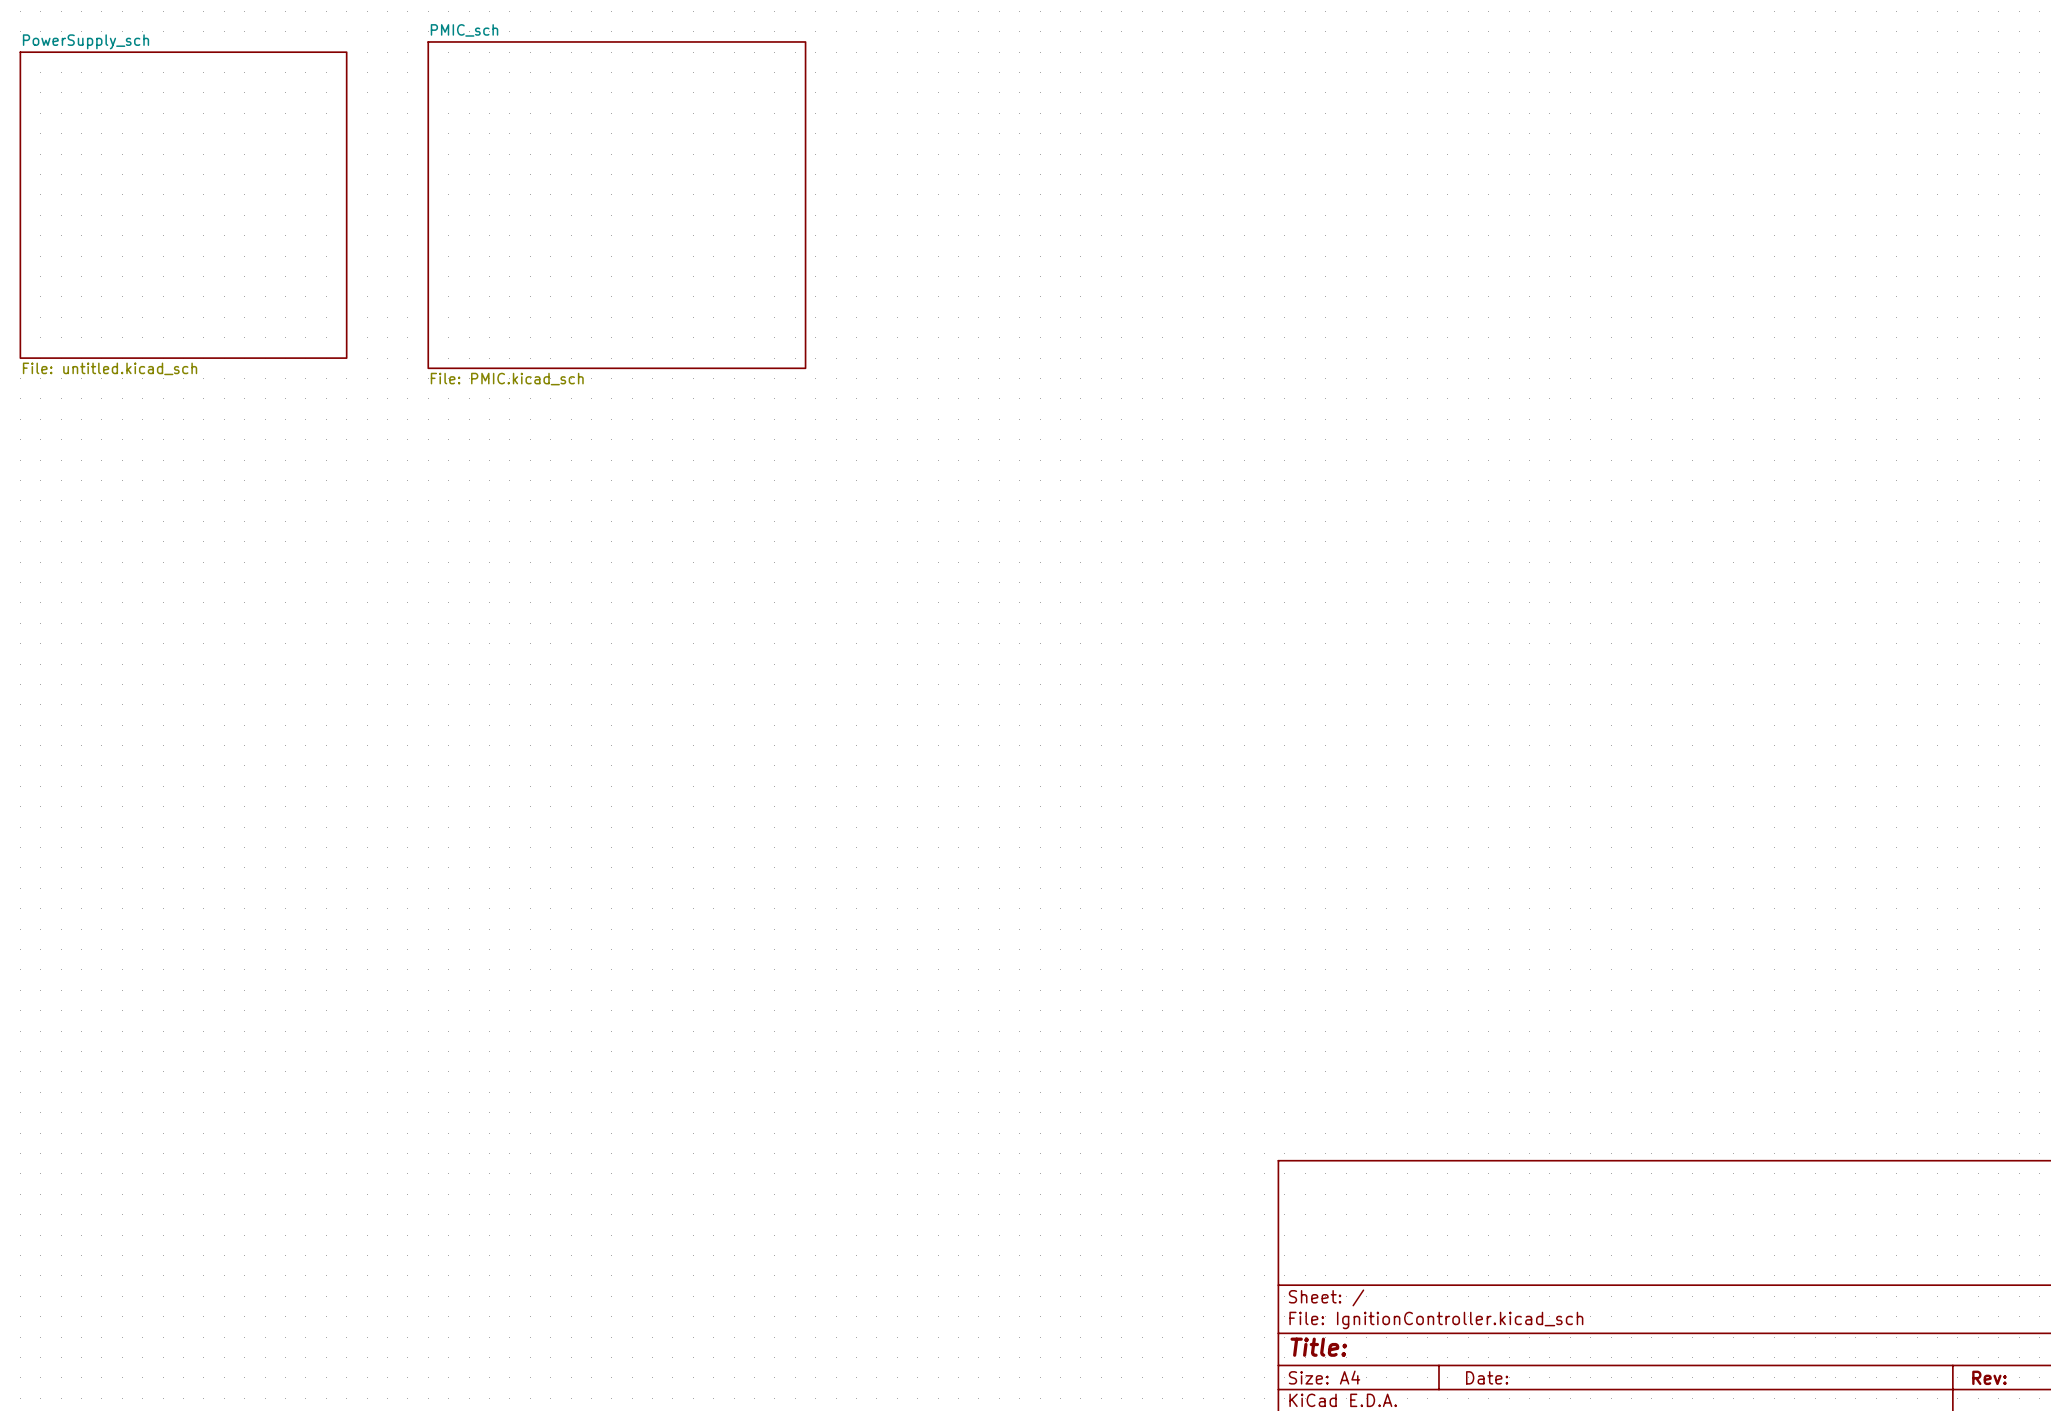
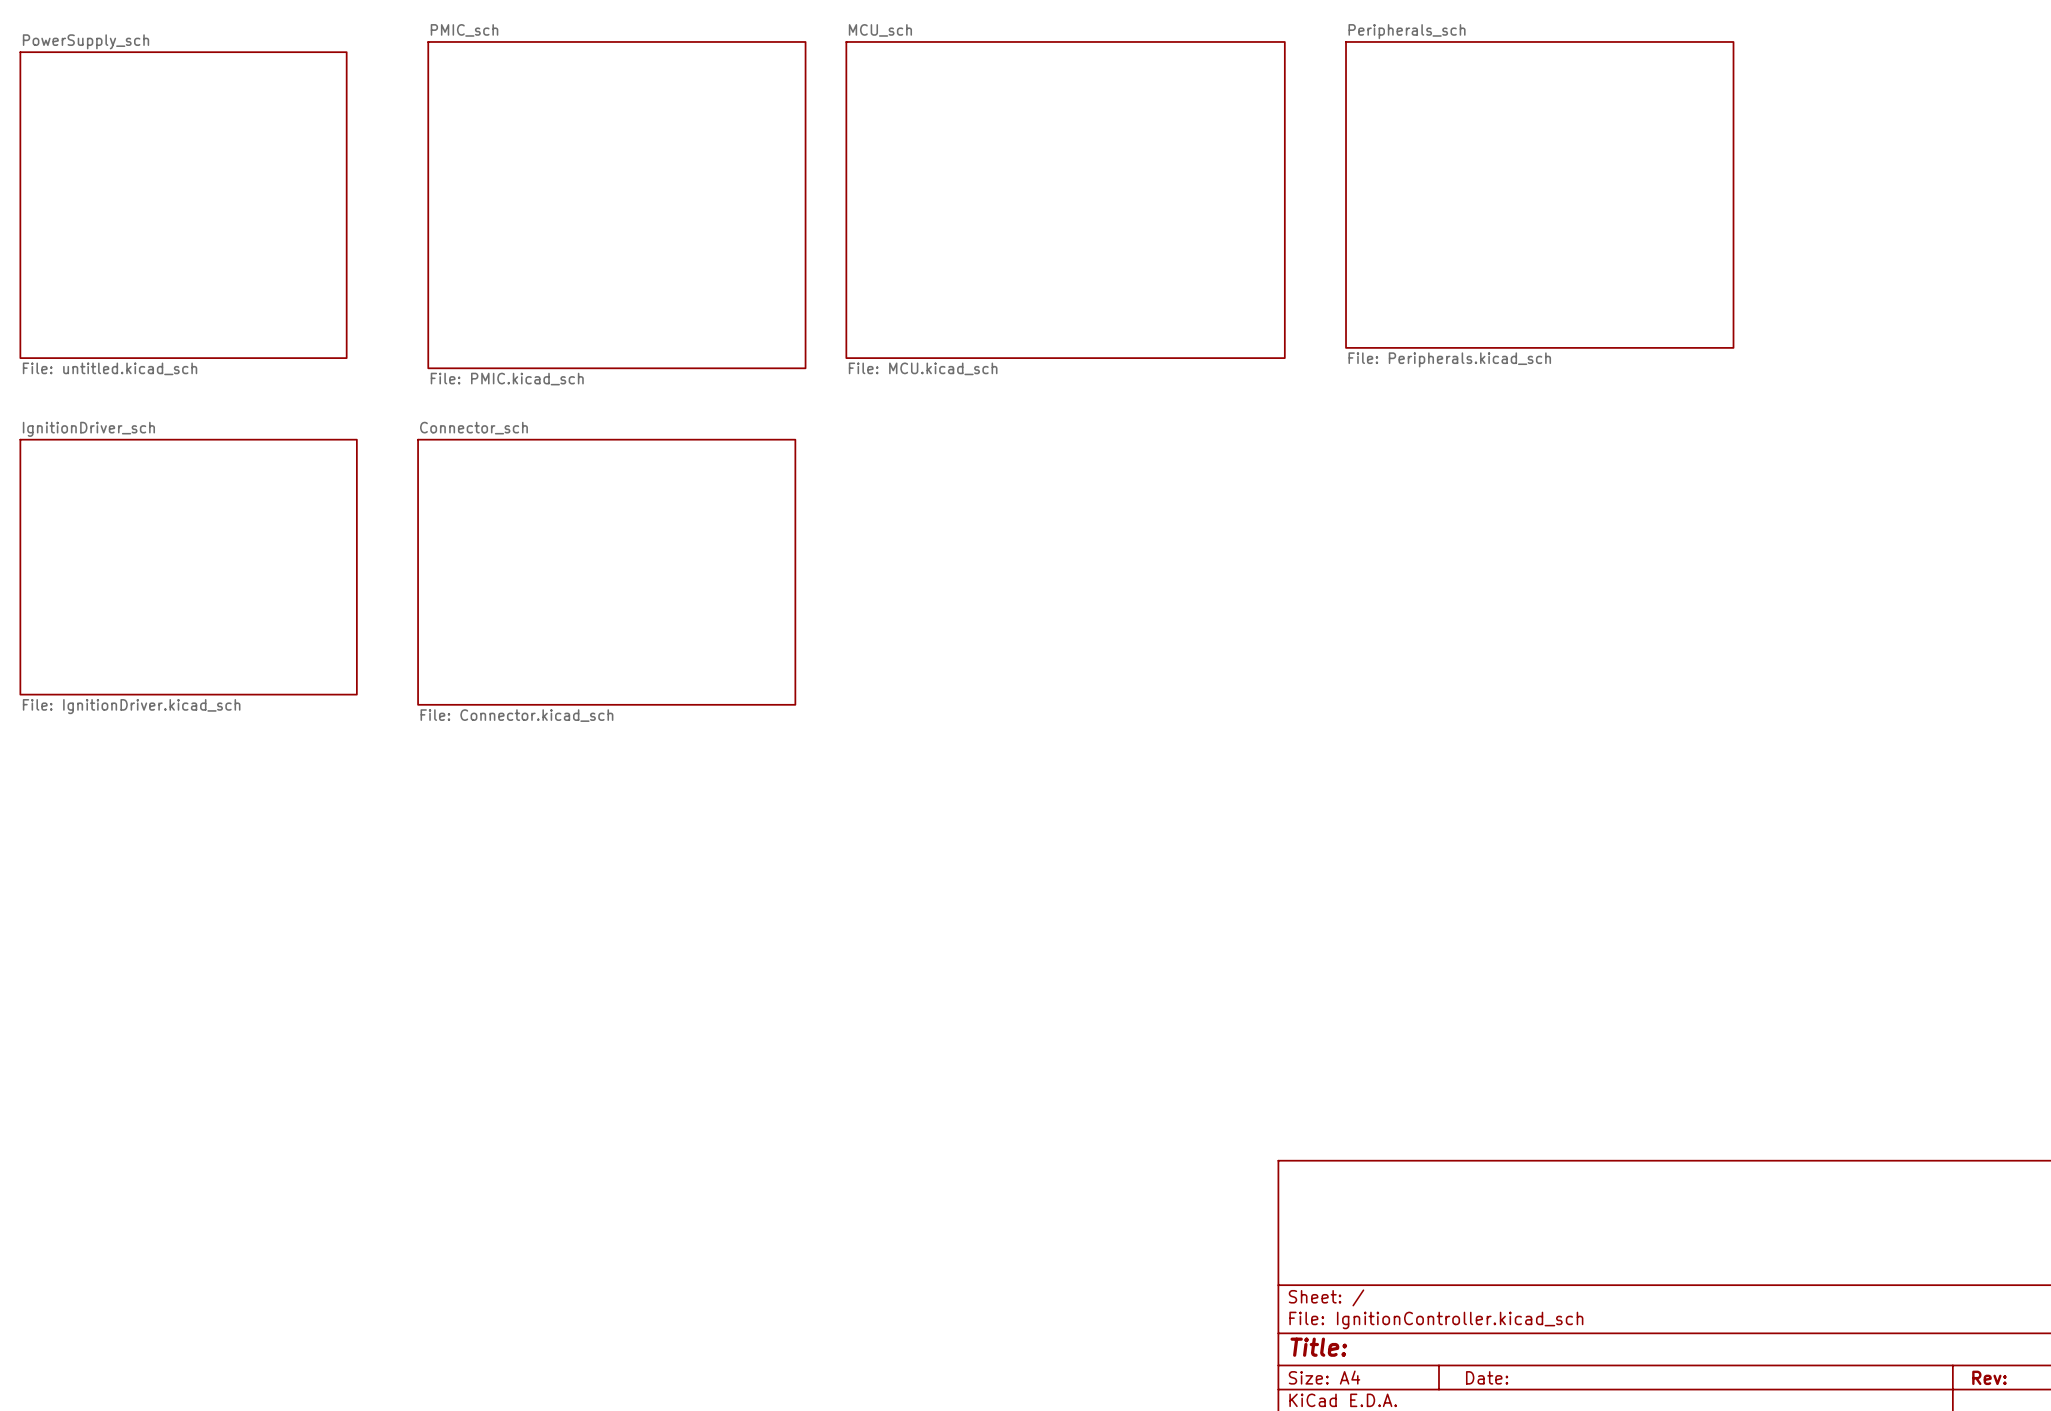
sheet Peripherals_sch: none -> File: Peripherals.kicad_sch (1539, 194)
sheet MCU_sch: none -> File: MCU.kicad_sch (1065, 200)
sheet IgnitionDriver_sch: none -> File: IgnitionDriver.kicad_sch (188, 567)
sheet Connector_sch: none -> File: Connector.kicad_sch (606, 572)

